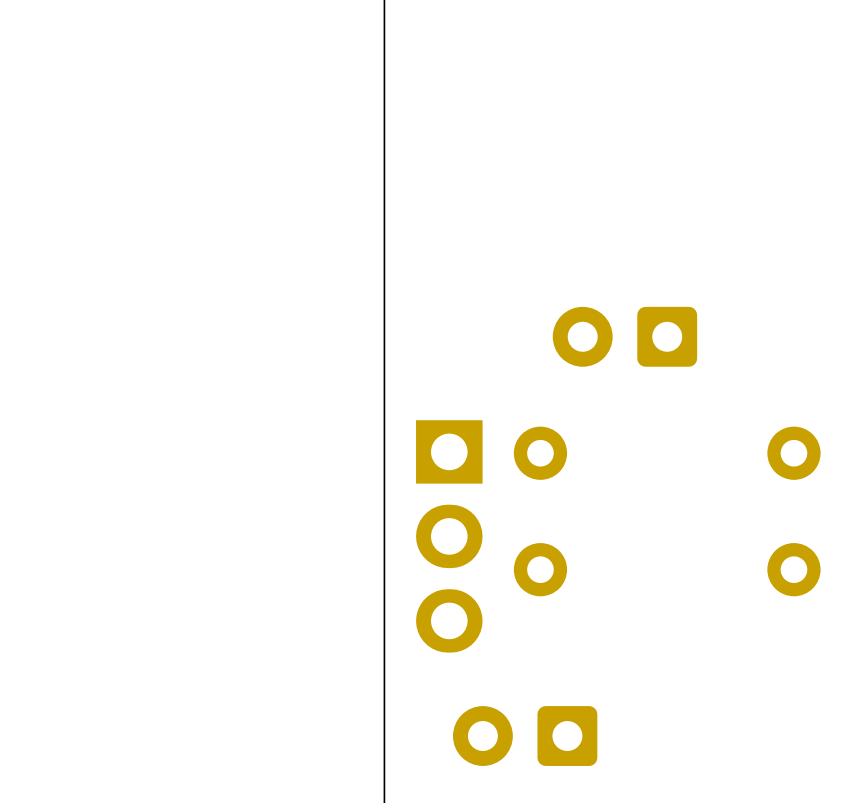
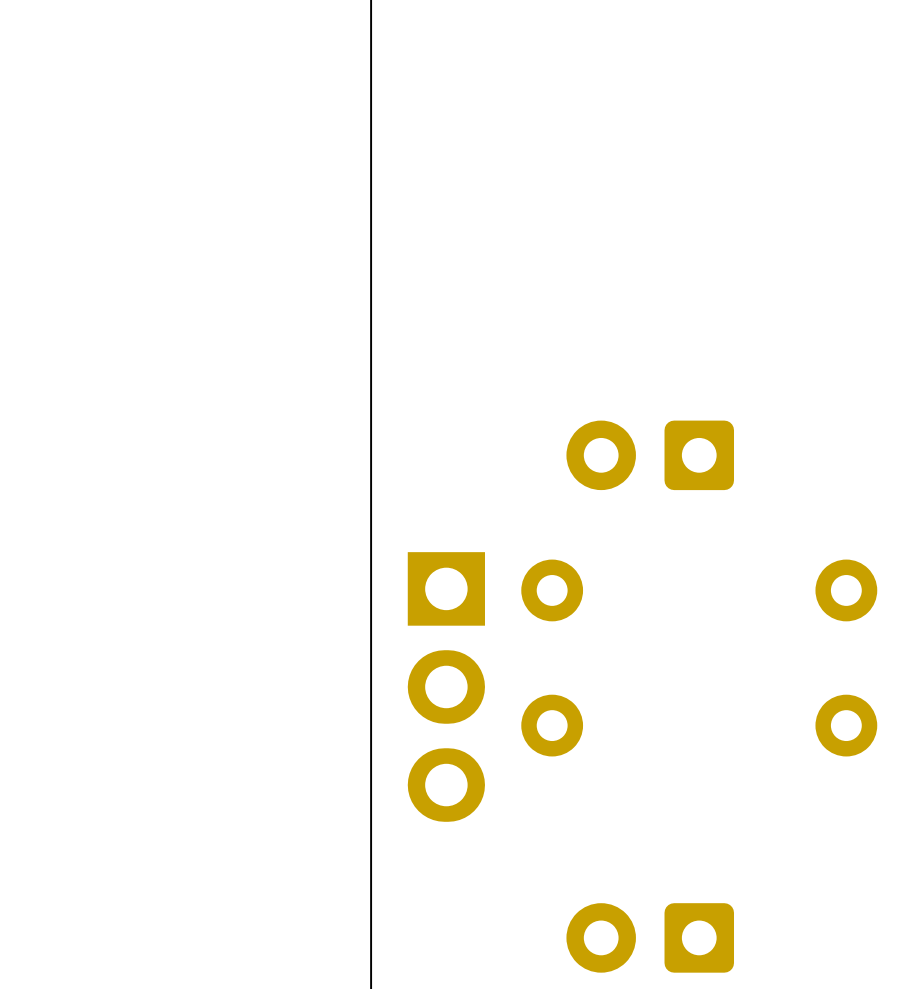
part position: (525, 736) -> (650, 937)

